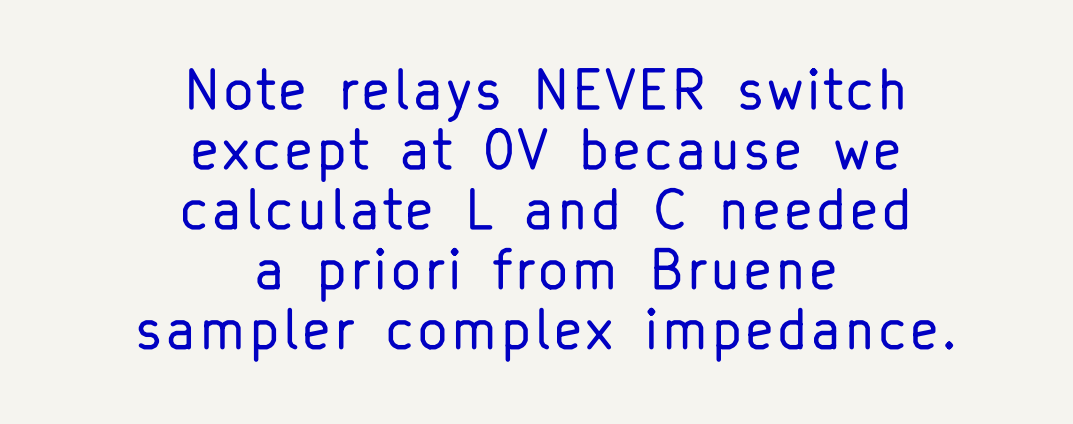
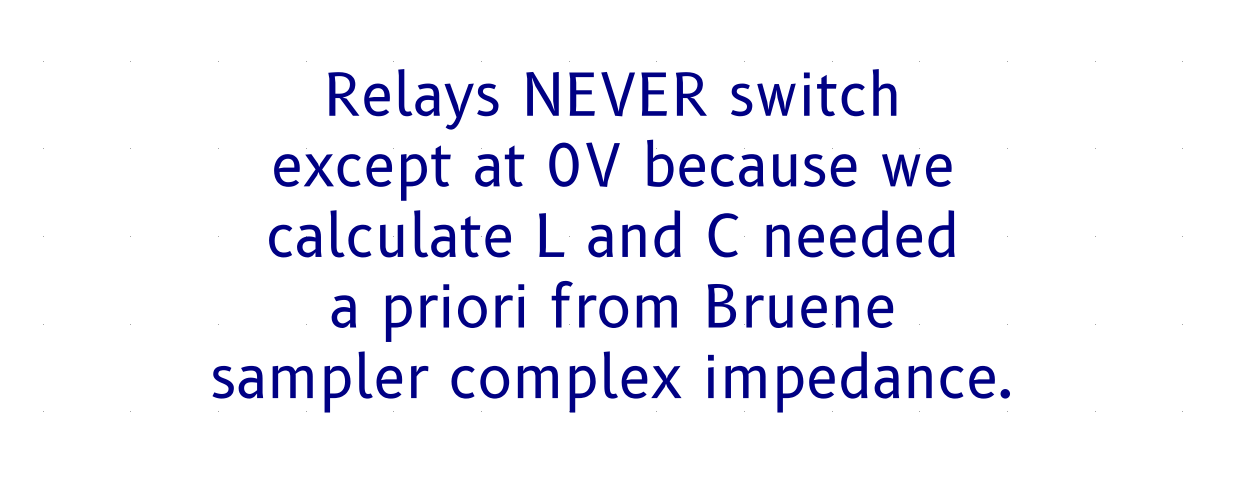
text: Note relays NEVER switch (545, 95) -> Relays NEVER switch (612, 99)

